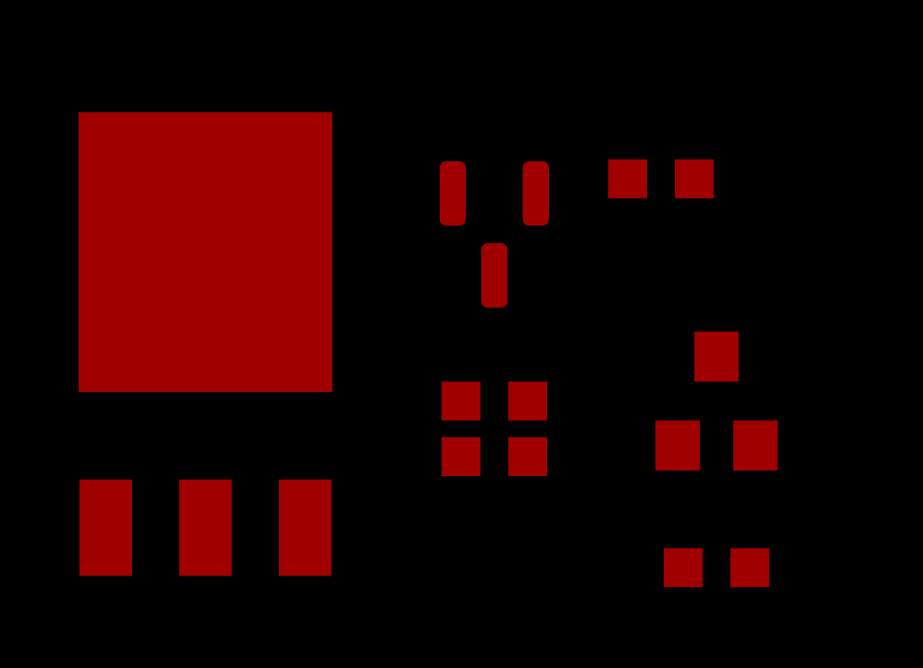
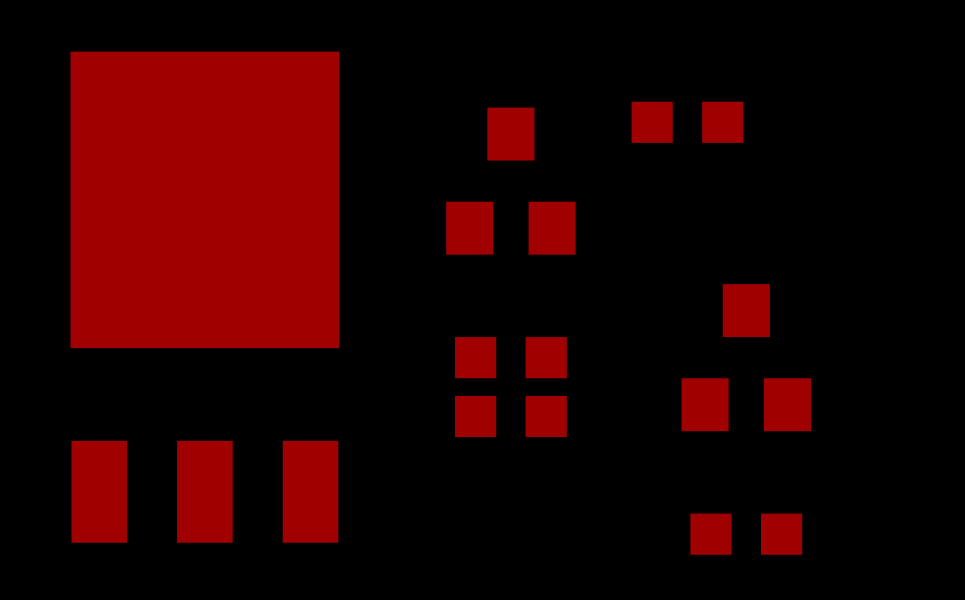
part footprint: [439, 161, 550, 308] -> [446, 107, 576, 255]

